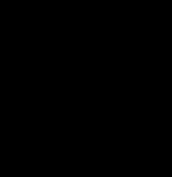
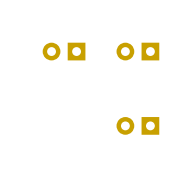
part: none -> (64, 51)
part: none -> (137, 51)
part: none -> (137, 125)

